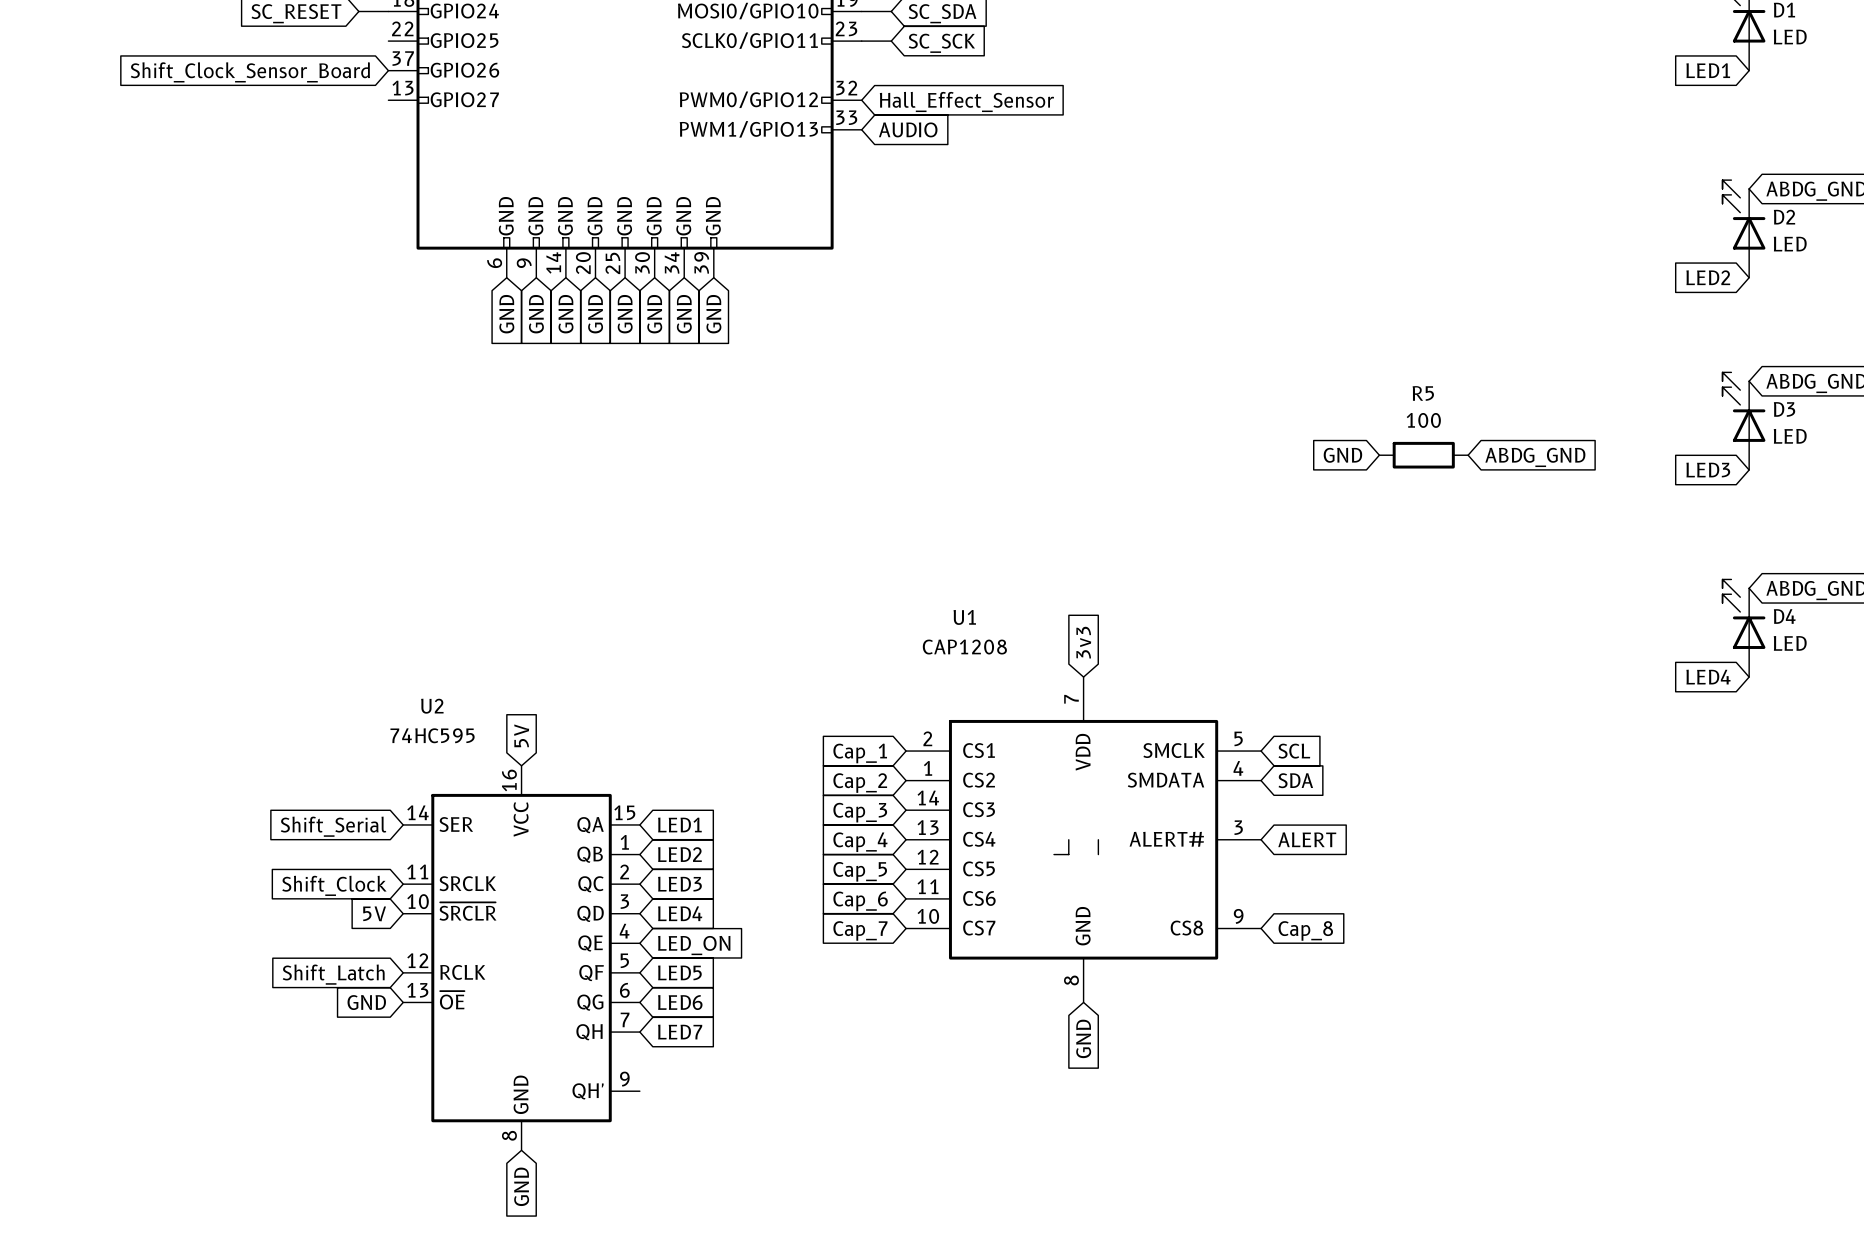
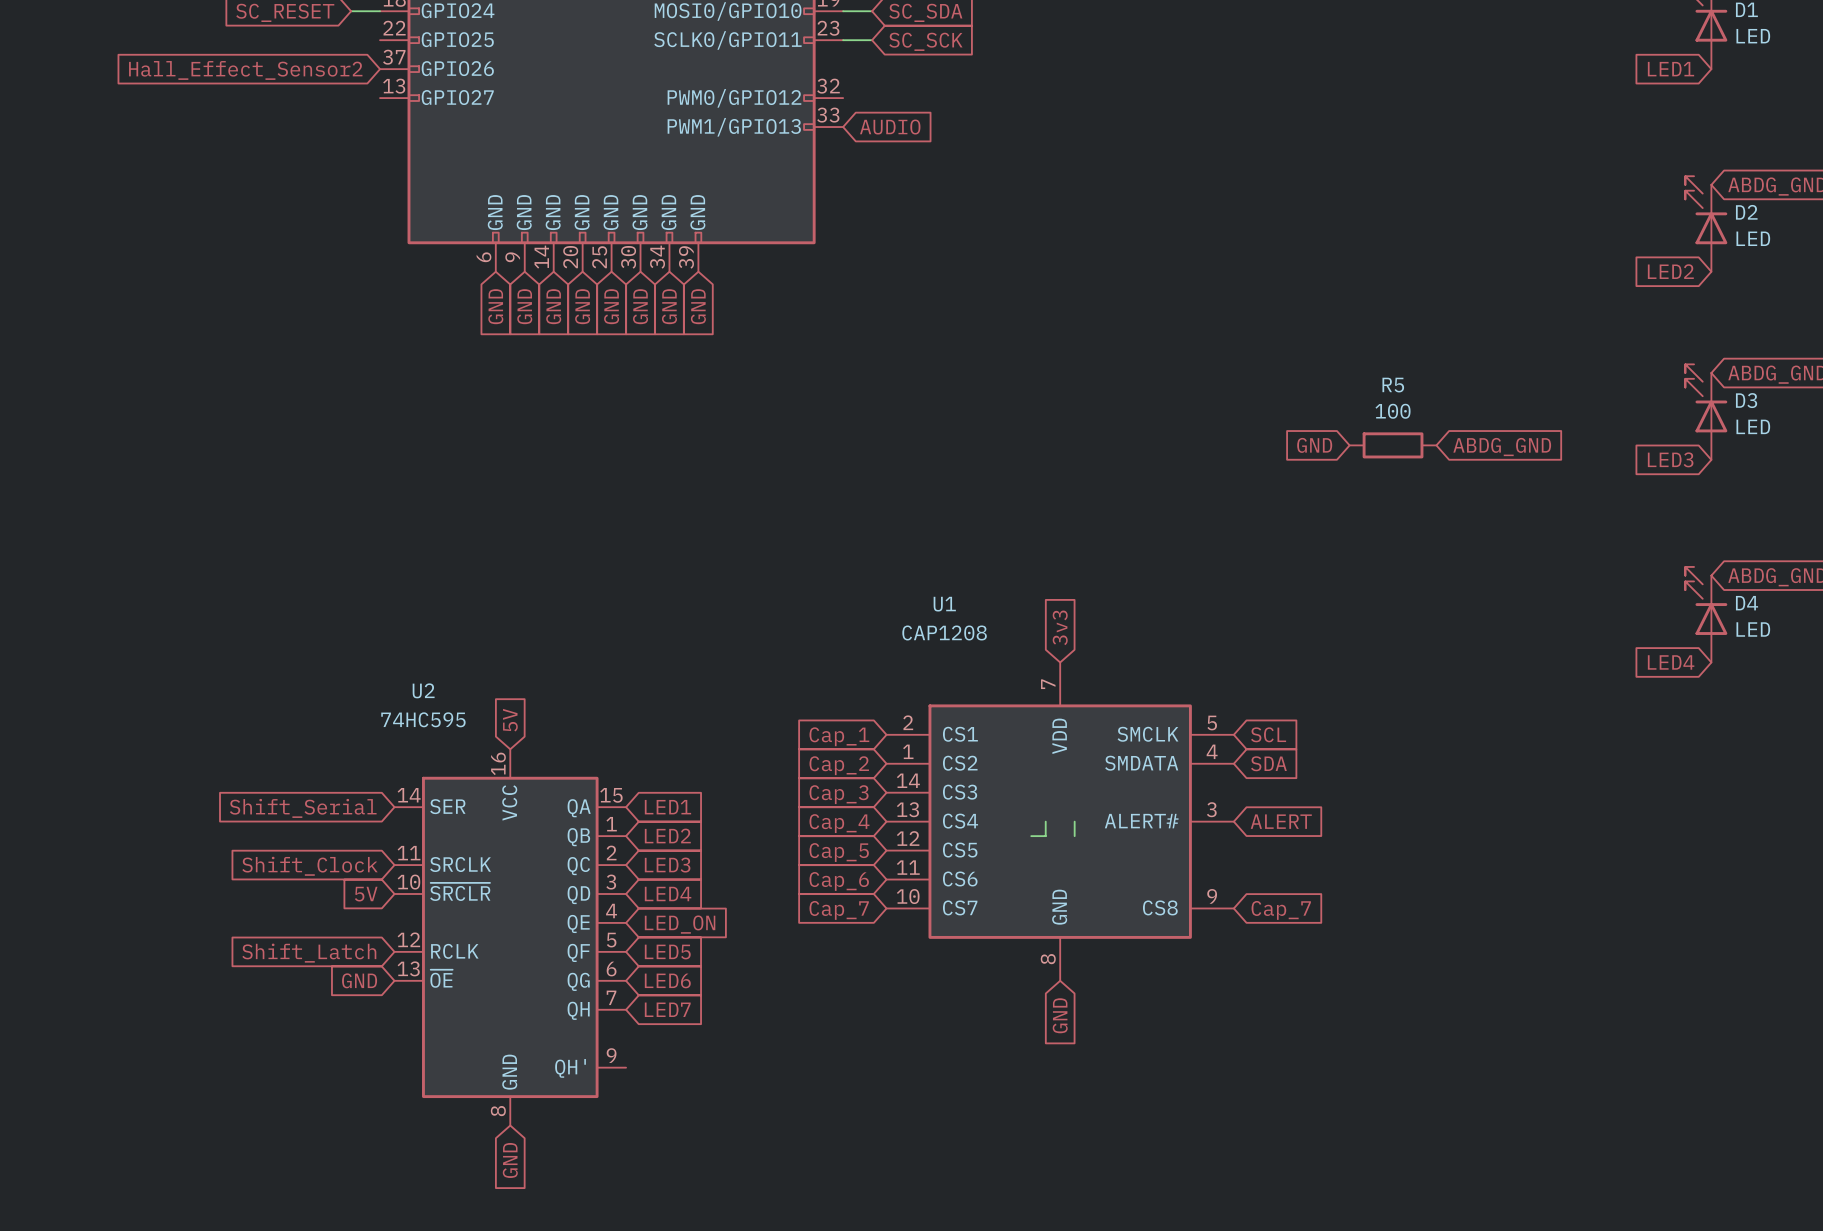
global label: Shift_Clock_Sensor_Board (250, 72) -> Hall_Effect_Sensor2 (245, 70)
global label: Hall_Effect_Sensor (966, 101) -> none
global label: Cap_8 (1305, 930) -> Cap_7 (1281, 910)

